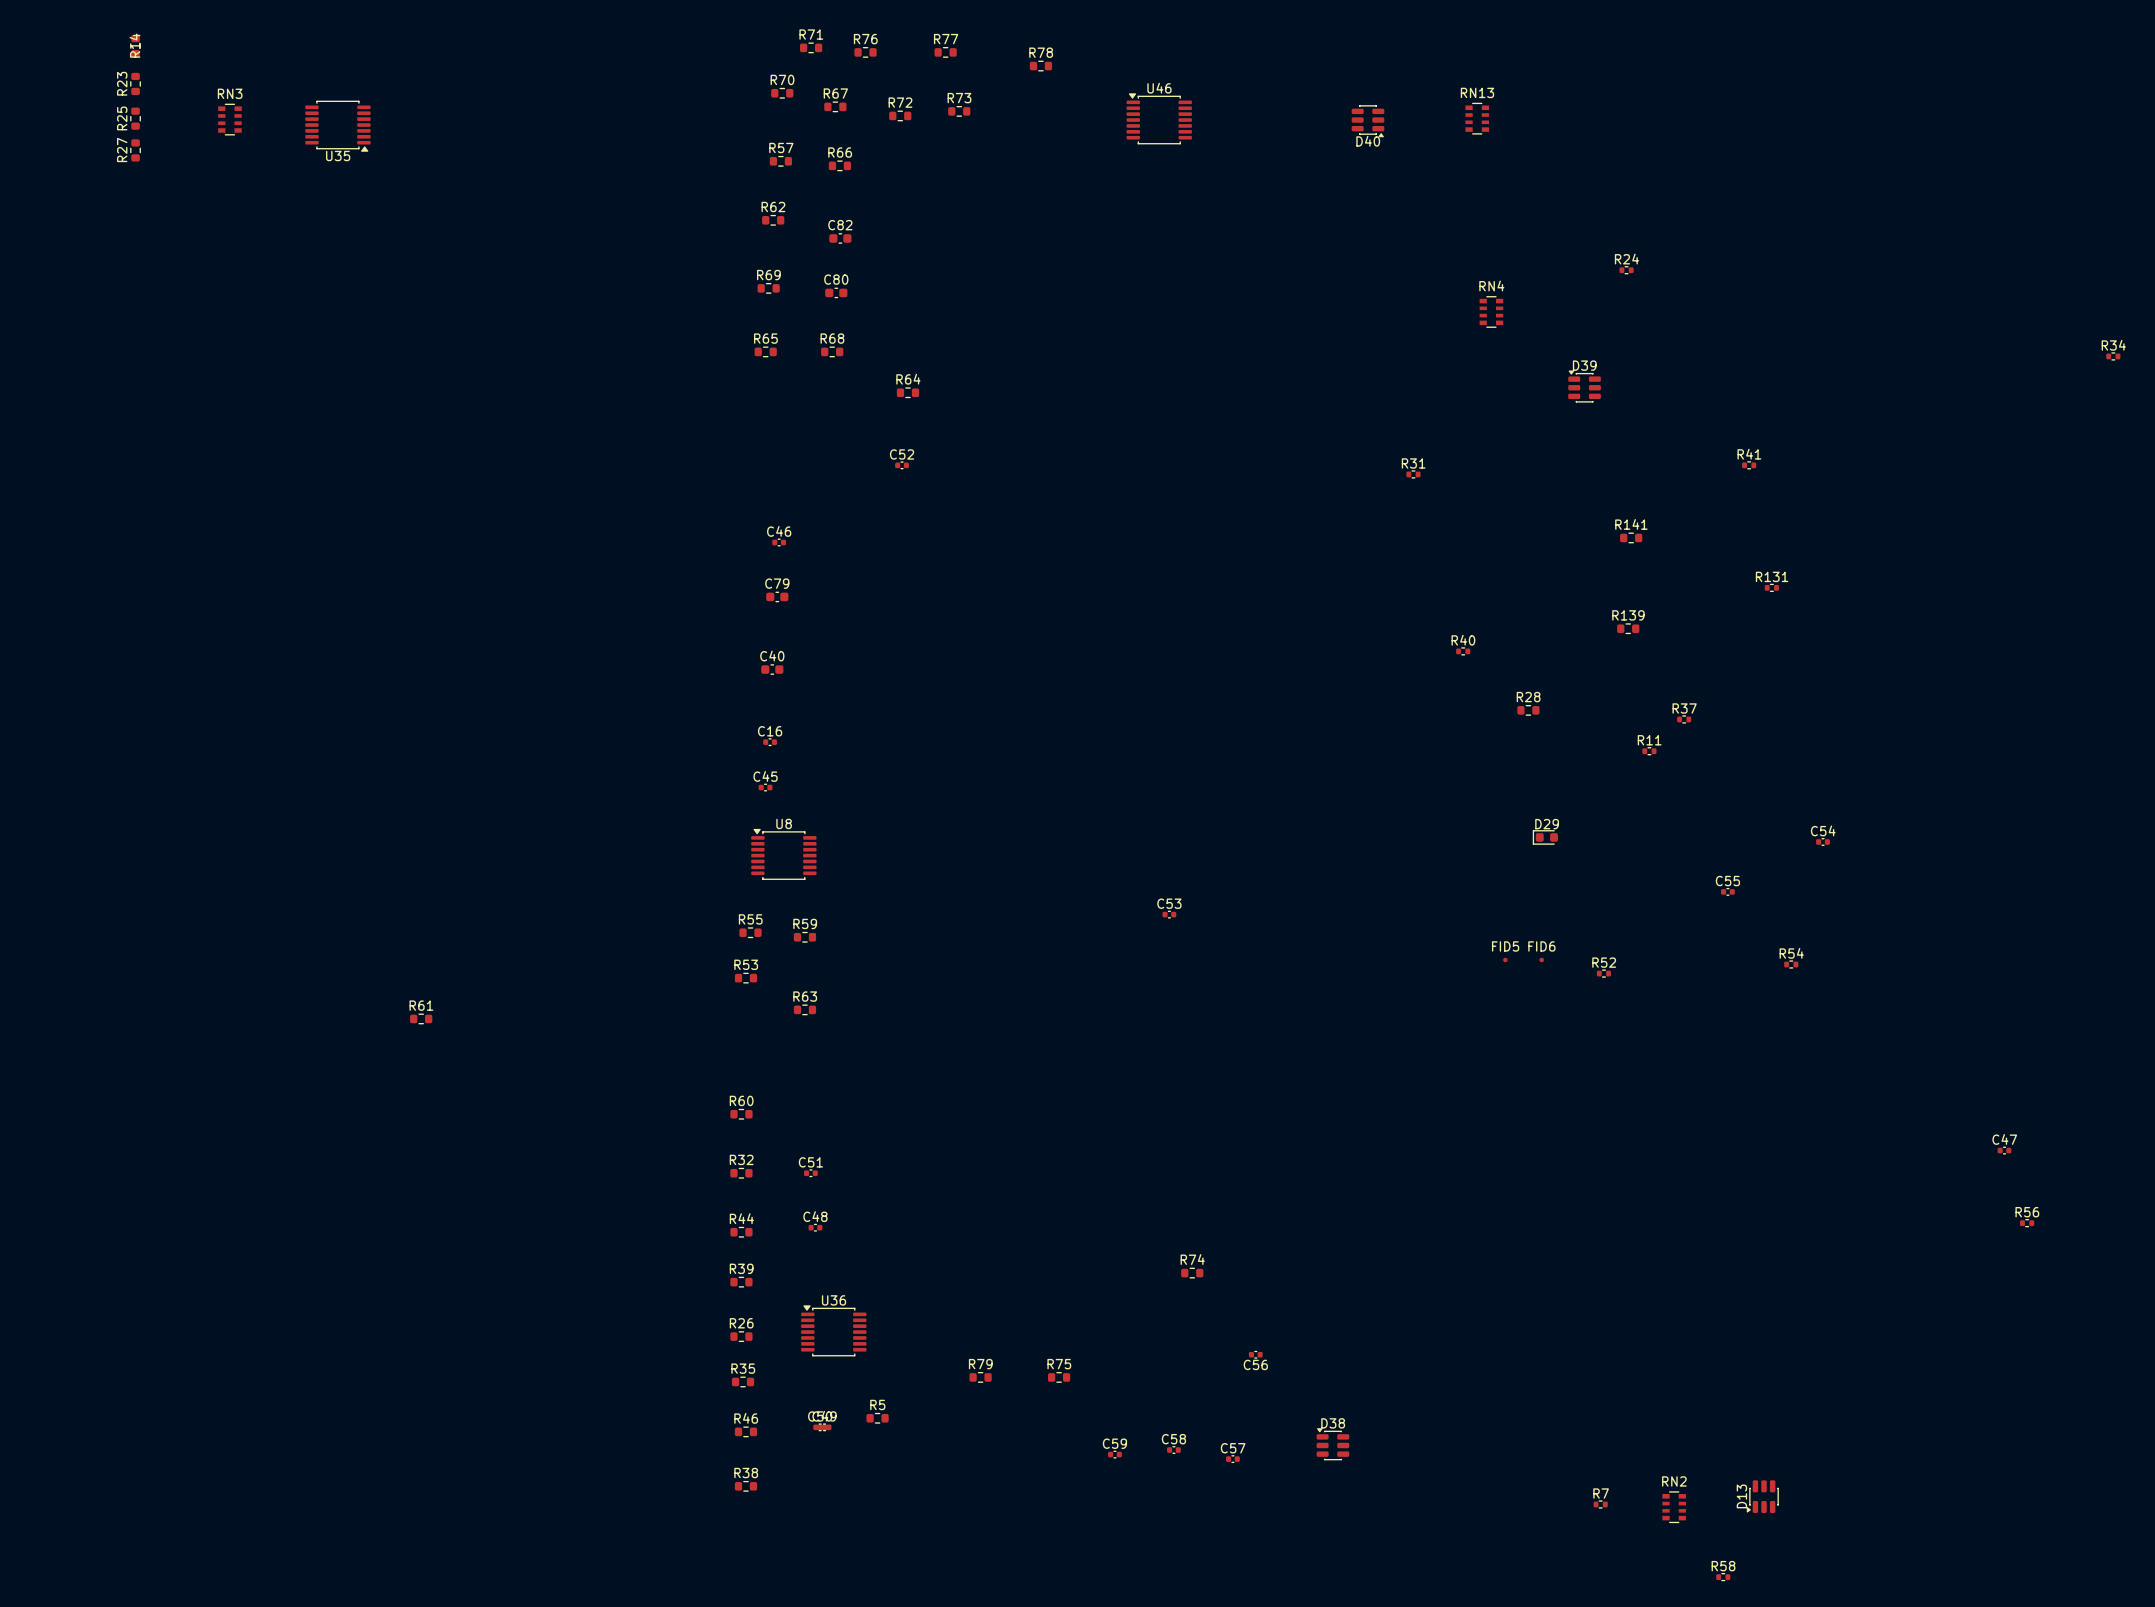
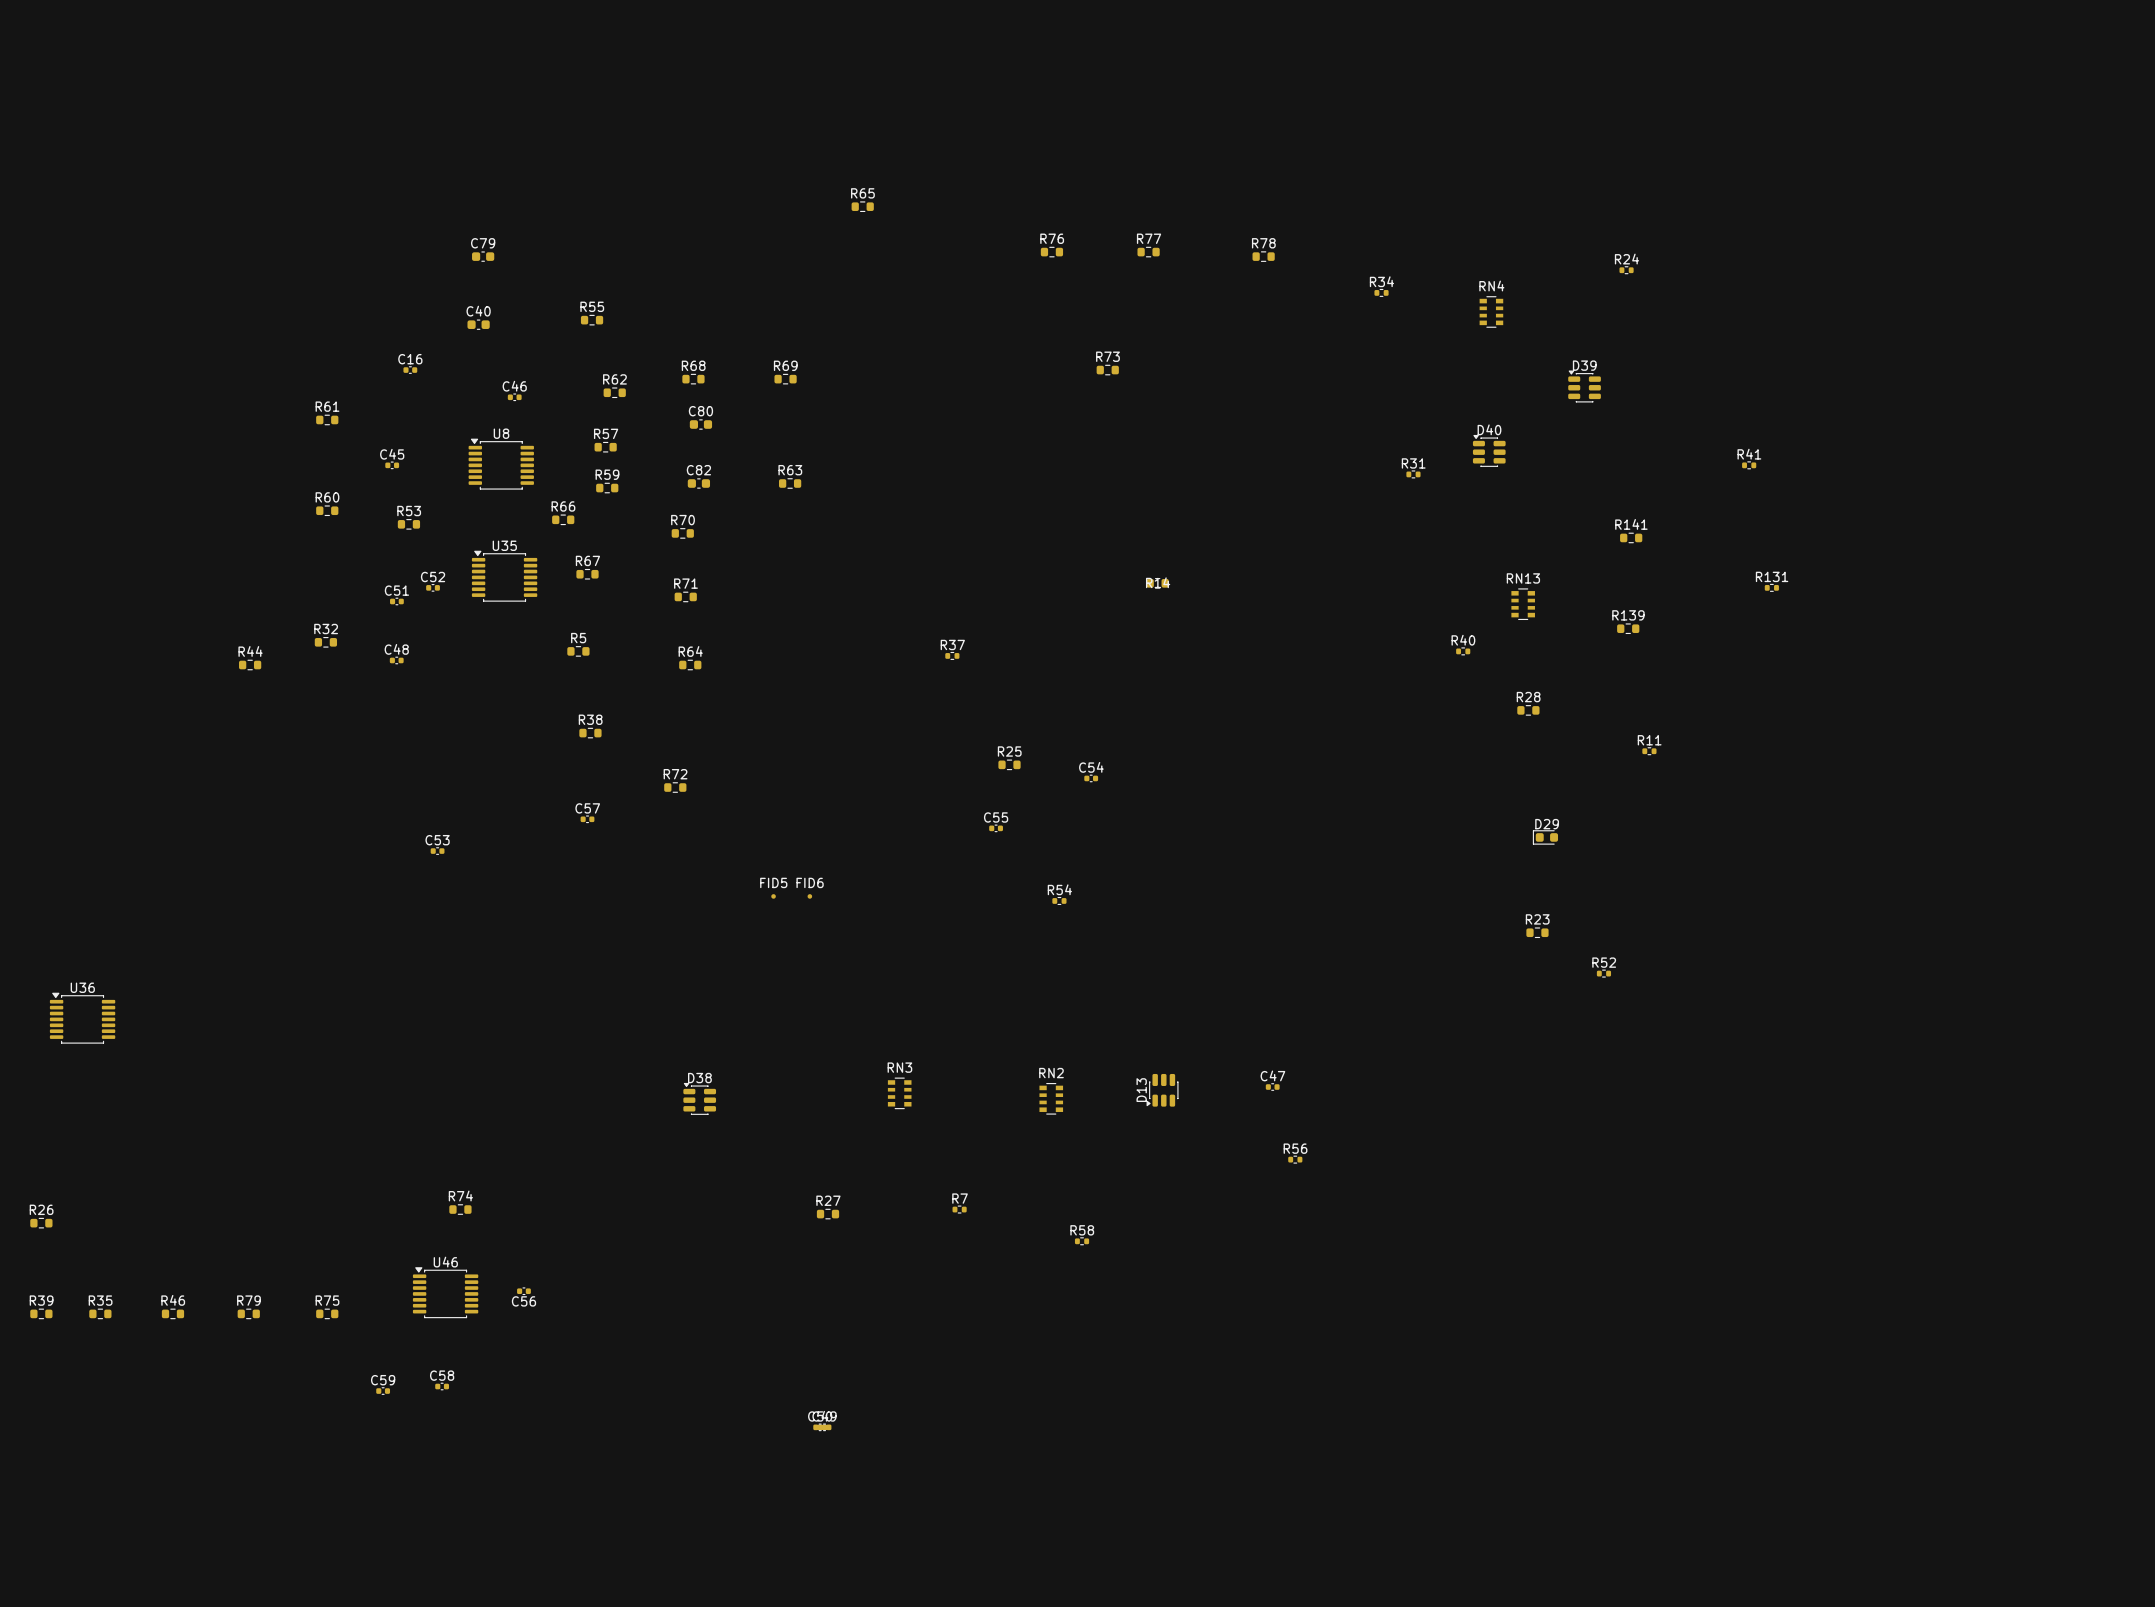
R14 rotation: 0° (135, 46) -> 90° clockwise (1157, 583)
R14 position: (135, 46) -> (1157, 583)
R71 position: (811, 47) -> (685, 596)
R76 position: (865, 52) -> (1051, 252)
R77 position: (945, 52) -> (1148, 252)
R78 position: (1040, 66) -> (1263, 256)
R23 rotation: 0° (135, 83) -> 90° clockwise (1537, 932)
R23 position: (135, 83) -> (1537, 932)
R70 position: (782, 93) -> (682, 533)
R67 position: (835, 106) -> (587, 574)
R73 position: (959, 111) -> (1107, 370)
R72 position: (900, 115) -> (675, 787)
R25 rotation: 0° (135, 118) -> 90° clockwise (1009, 764)
R25 position: (135, 118) -> (1009, 764)
U46 position: (1159, 118) -> (445, 1292)
RN13 position: (1477, 118) -> (1523, 604)
RN3 position: (229, 119) -> (899, 1093)
D40 rotation: 0° (1367, 121) -> 180° (1489, 450)
D40 position: (1367, 121) -> (1489, 450)
U35 rotation: 0° (337, 126) -> 180° (504, 576)
U35 position: (337, 126) -> (504, 576)
R27 rotation: 0° (135, 150) -> 90° clockwise (828, 1214)
R27 position: (135, 150) -> (828, 1214)
R57 position: (780, 161) -> (605, 447)
R66 position: (839, 165) -> (563, 519)
R62 position: (773, 220) -> (614, 392)
C82 position: (840, 238) -> (698, 483)
R69 position: (768, 288) -> (785, 379)
C80 position: (836, 292) -> (700, 424)
R65 position: (765, 351) -> (862, 206)
R68 position: (832, 351) -> (693, 379)
R34 position: (2113, 356) -> (1381, 292)
R64 position: (907, 392) -> (690, 665)
C52 position: (902, 465) -> (433, 587)
C46 position: (779, 542) -> (514, 397)
C79 position: (777, 596) -> (483, 256)
C40 position: (772, 669) -> (478, 324)
R37 position: (1684, 719) -> (952, 655)
C16 position: (770, 742) -> (410, 370)
C45 position: (765, 787) -> (392, 465)
C54 position: (1823, 841) -> (1091, 778)
U8 position: (783, 854) -> (501, 464)
C55 position: (1727, 891) -> (996, 828)
C53 position: (1169, 914) -> (437, 851)
R55 position: (750, 932) -> (592, 320)
R59 position: (804, 937) -> (607, 488)
FID5 position: (1505, 959) -> (773, 896)
FID6 position: (1541, 959) -> (809, 896)
R54 position: (1791, 964) -> (1059, 900)
R53 position: (745, 978) -> (408, 524)
R63 position: (804, 1009) -> (790, 483)
R61 position: (421, 1018) -> (327, 419)
R60 position: (741, 1114) -> (327, 510)
C47 position: (2004, 1150) -> (1272, 1087)
R32 position: (741, 1173) -> (325, 642)
C51 position: (810, 1173) -> (396, 601)
R56 position: (2027, 1223) -> (1295, 1159)
C48 position: (815, 1227) -> (396, 660)
R44 position: (741, 1232) -> (250, 665)
R74 position: (1192, 1273) -> (460, 1209)
R39 position: (741, 1282) -> (41, 1313)
U36 position: (833, 1330) -> (82, 1018)
R26 position: (741, 1336) -> (41, 1223)
C56 position: (1255, 1354) -> (523, 1291)
R79 position: (980, 1377) -> (248, 1313)
R75 position: (1059, 1377) -> (327, 1313)
R35 position: (743, 1381) -> (100, 1313)
R5 position: (877, 1418) -> (578, 651)
R46 position: (745, 1431) -> (172, 1313)
D38 position: (1332, 1444) -> (699, 1098)
C58 position: (1173, 1450) -> (442, 1386)
C59 position: (1114, 1454) -> (383, 1391)
C57 position: (1232, 1459) -> (587, 819)
R38 position: (745, 1486) -> (590, 733)
D13 position: (1762, 1496) -> (1162, 1090)
R7 position: (1600, 1504) -> (959, 1209)
RN2 position: (1674, 1507) -> (1051, 1098)
R58 position: (1723, 1577) -> (1082, 1241)

